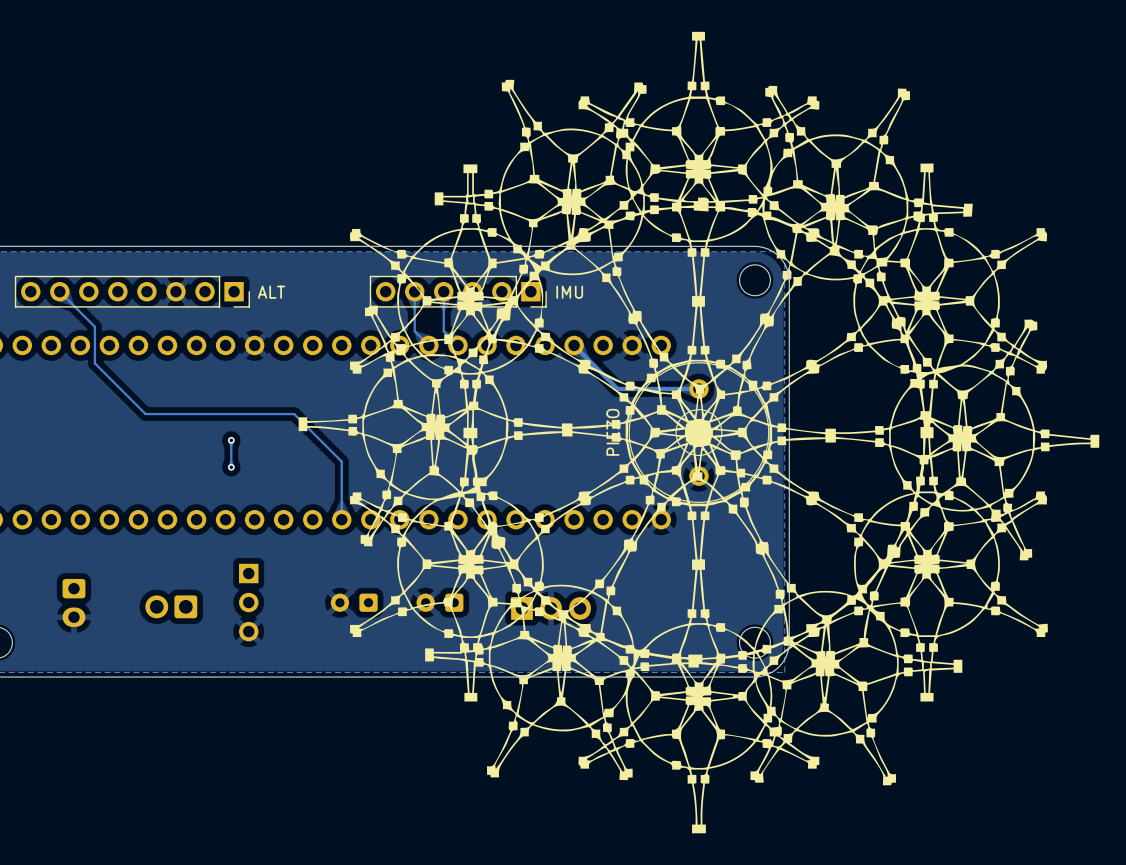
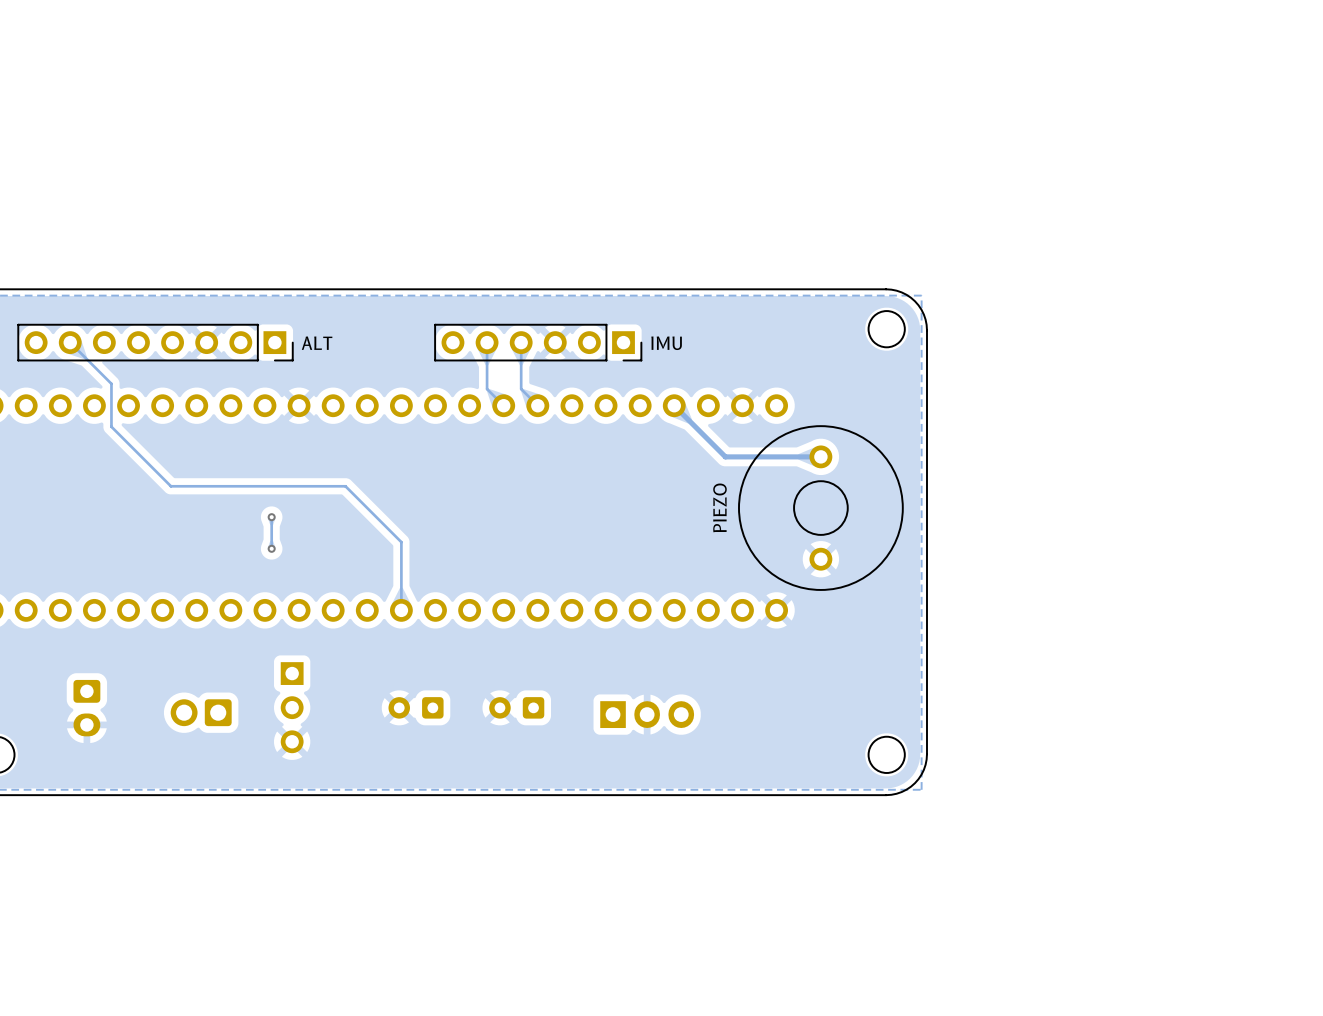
drawing: [298, 31, 1100, 834] -> none

